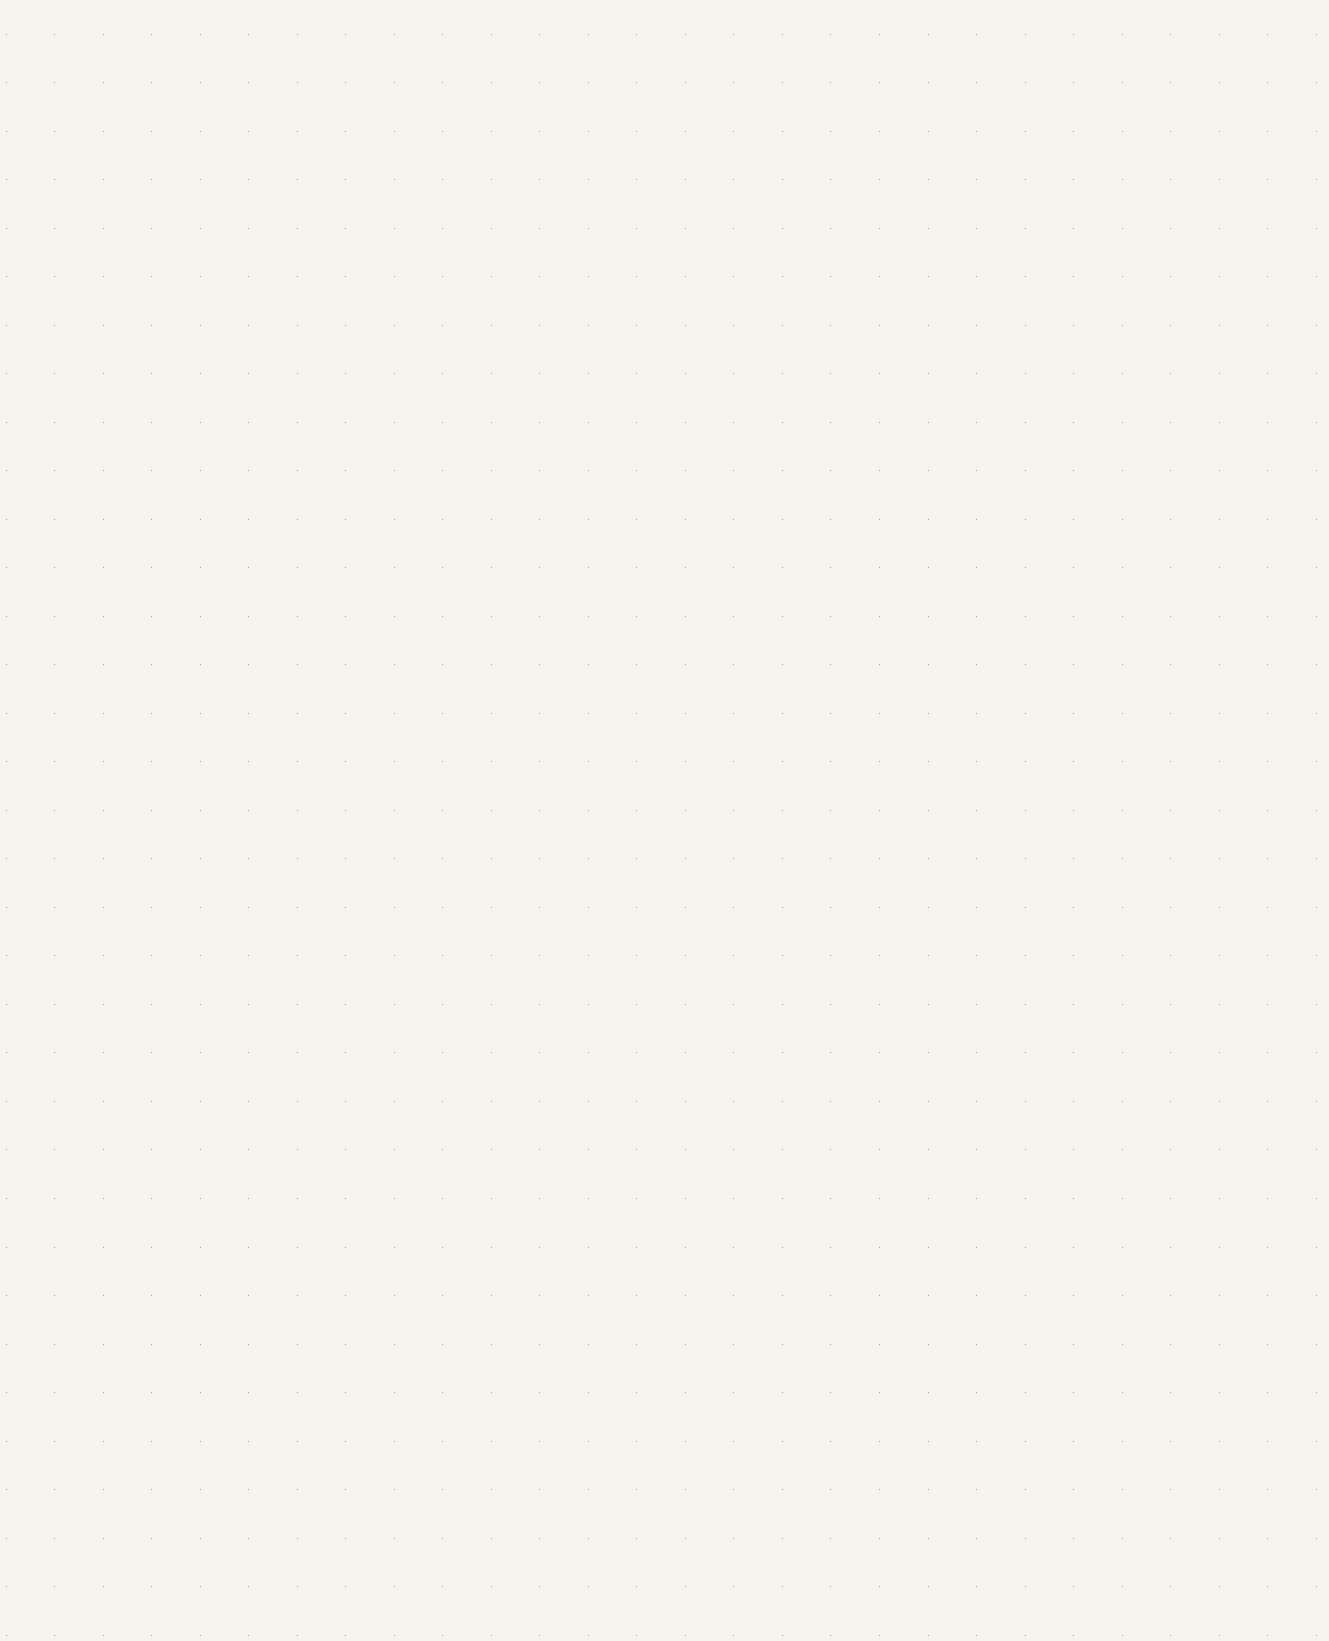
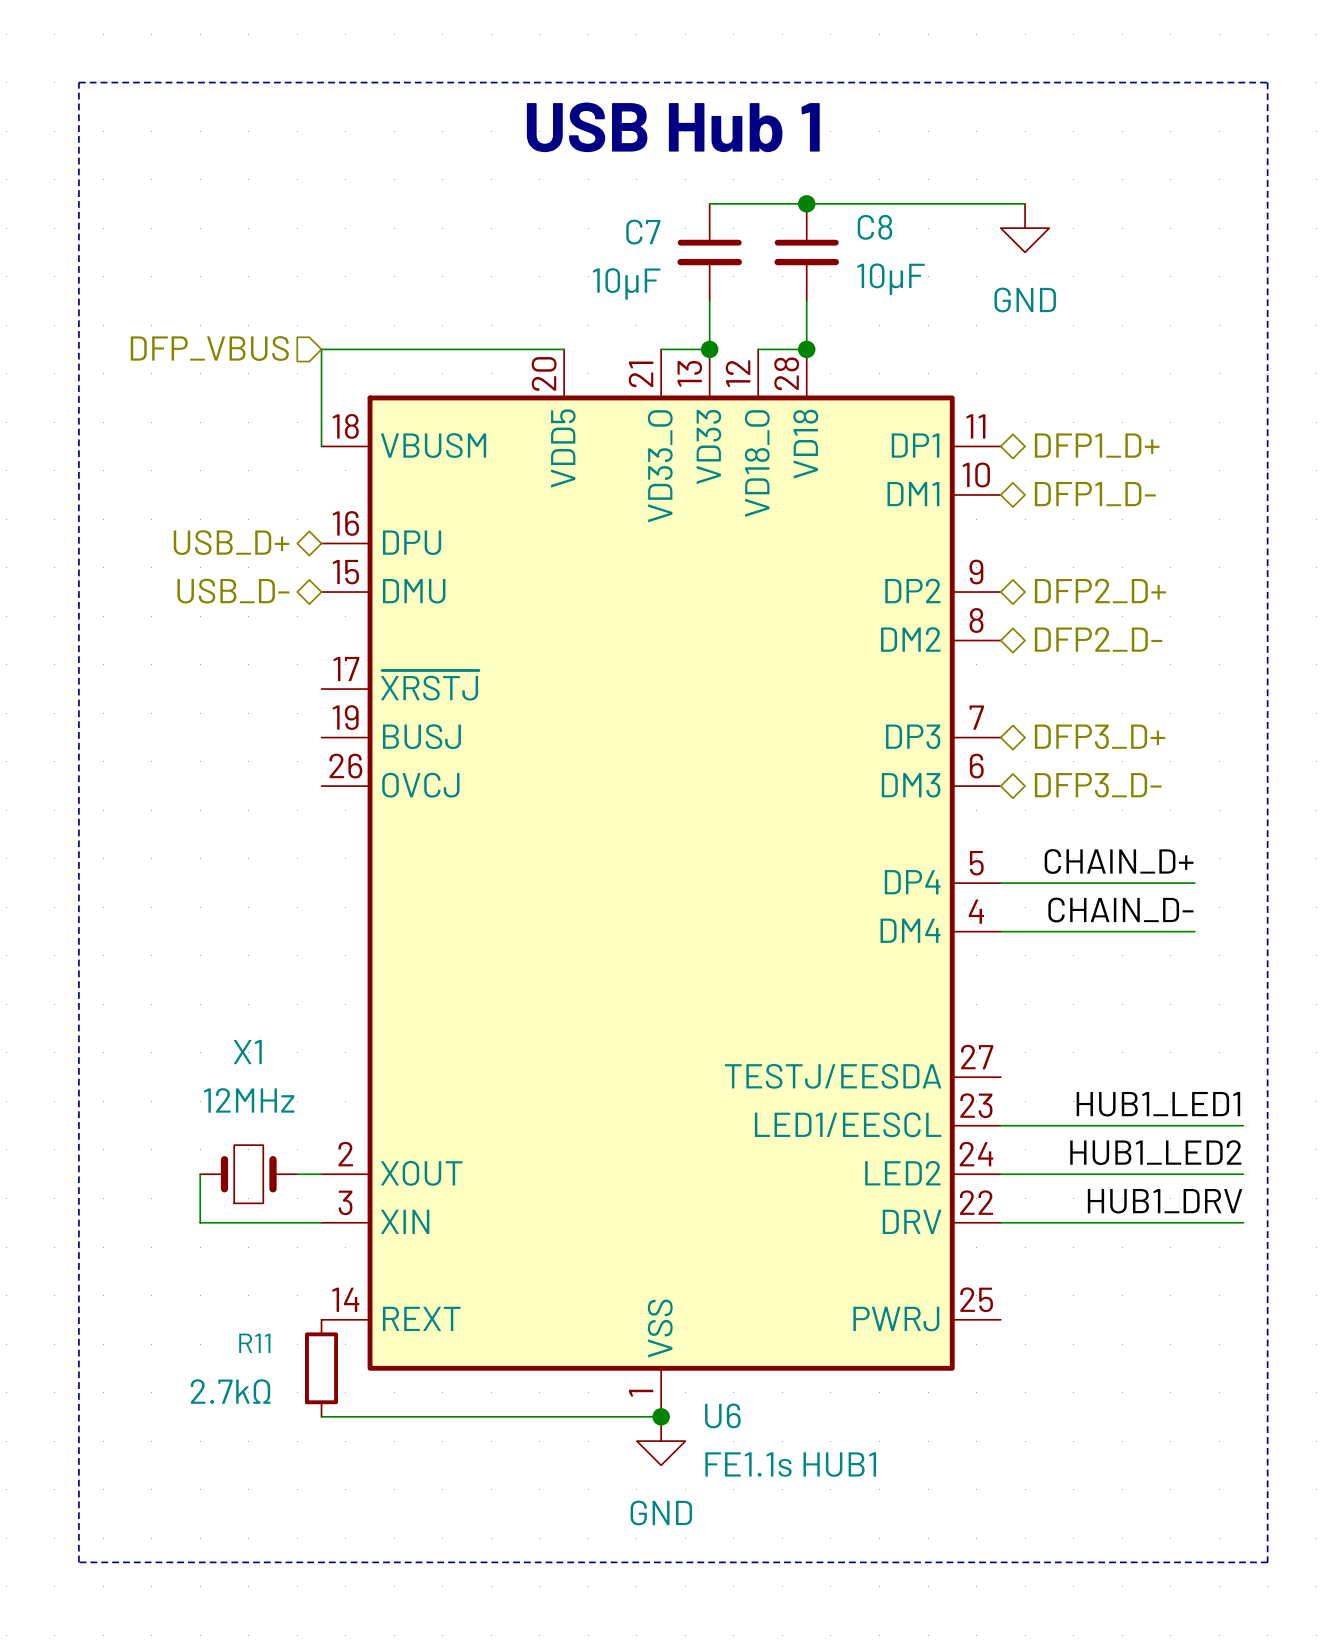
line: none -> (78, 82) (1267, 82) (1267, 1562) (78, 1562) (78, 82)
text: none -> USB Hub 1 (673, 127)
wire: none -> (709, 203) (1025, 203)
junction: none -> (806, 203)
power symbol: none -> GND (1025, 228)
C7: none -> 10μF (709, 252)
C8: none -> 10μF (806, 252)
wire: none -> (709, 300) (709, 349) (661, 349)
wire: none -> (806, 300) (806, 349) (758, 349)
hierarchical label: none -> DFP_VBUS (209, 348)
wire: none -> (564, 349) (321, 349) (321, 446)
junction: none -> (709, 349)
junction: none -> (806, 349)
hierarchical label: none -> DFP1_D+ (1097, 445)
hierarchical label: none -> DFP1_D- (1095, 494)
hierarchical label: none -> USB_D+ (231, 542)
hierarchical label: none -> USB_D- (233, 591)
hierarchical label: none -> DFP2_D+ (1100, 590)
hierarchical label: none -> DFP2_D- (1098, 639)
hierarchical label: none -> DFP3_D+ (1100, 736)
hierarchical label: none -> DFP3_D- (1098, 785)
label: none -> CHAIN_D+ (1119, 861)
U6: none -> FE1.1s HUB1 (661, 883)
wire: none -> (1000, 883) (1194, 883)
label: none -> CHAIN_D- (1120, 910)
wire: none -> (1000, 931) (1194, 931)
label: none -> HUB1_LED1 (1158, 1104)
wire: none -> (1000, 1125) (1243, 1125)
label: none -> HUB1_LED2 (1155, 1152)
wire: none -> (200, 1174) (200, 1222) (321, 1222)
X1: none -> 12MHz (248, 1174)
wire: none -> (297, 1174) (321, 1174)
wire: none -> (1000, 1174) (1243, 1174)
label: none -> HUB1_DRV (1165, 1201)
wire: none -> (1000, 1222) (1243, 1222)
R11: none -> 2.7kΩ (321, 1368)
wire: none -> (321, 1416) (661, 1416)
junction: none -> (661, 1416)
power symbol: none -> GND (661, 1441)

